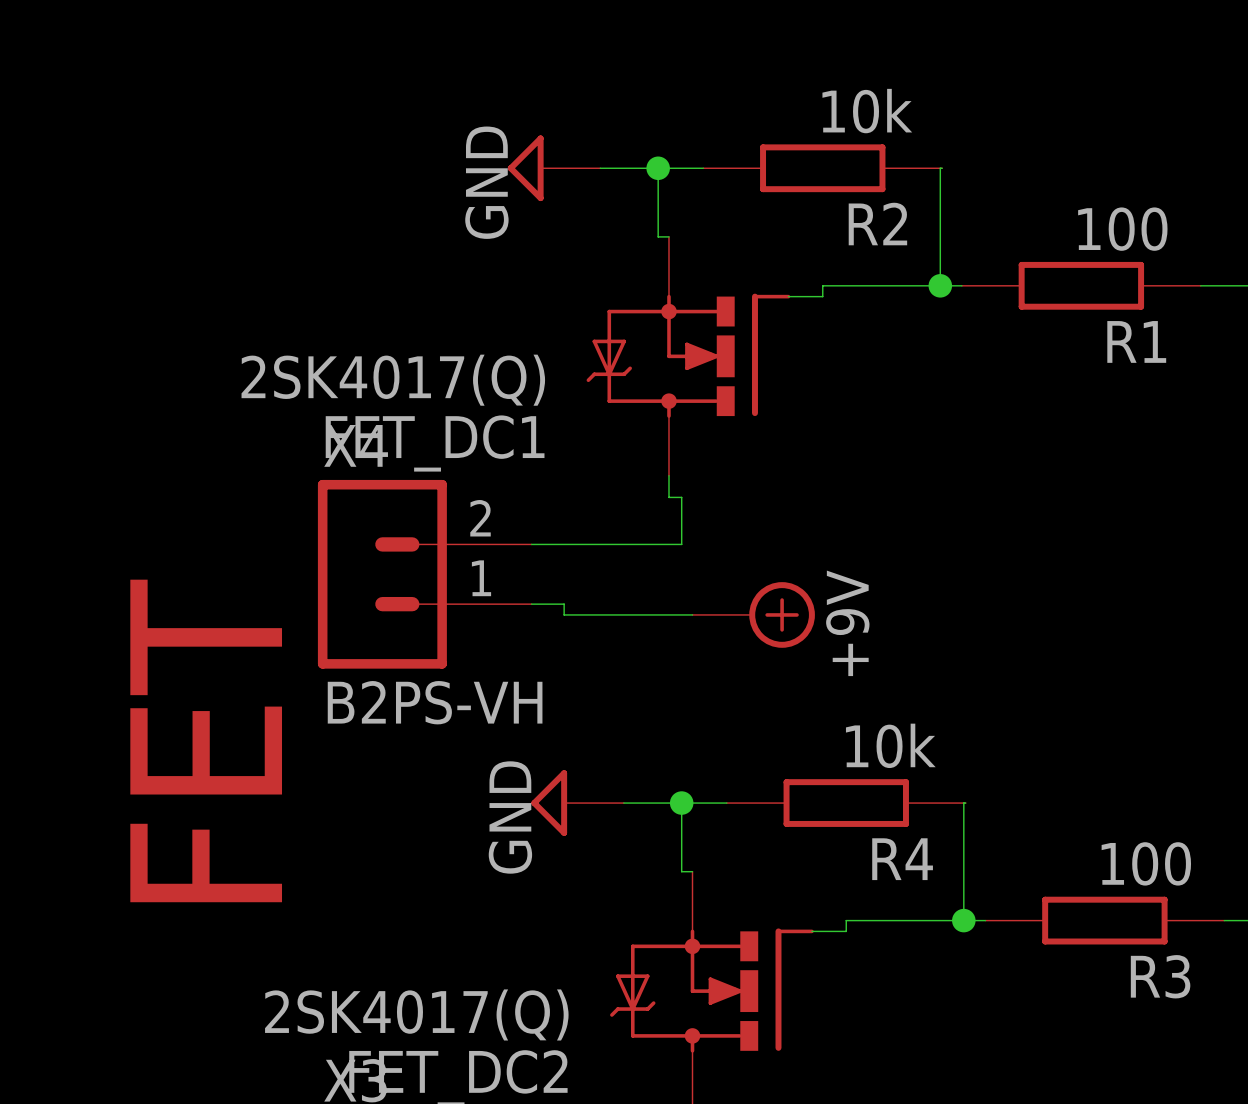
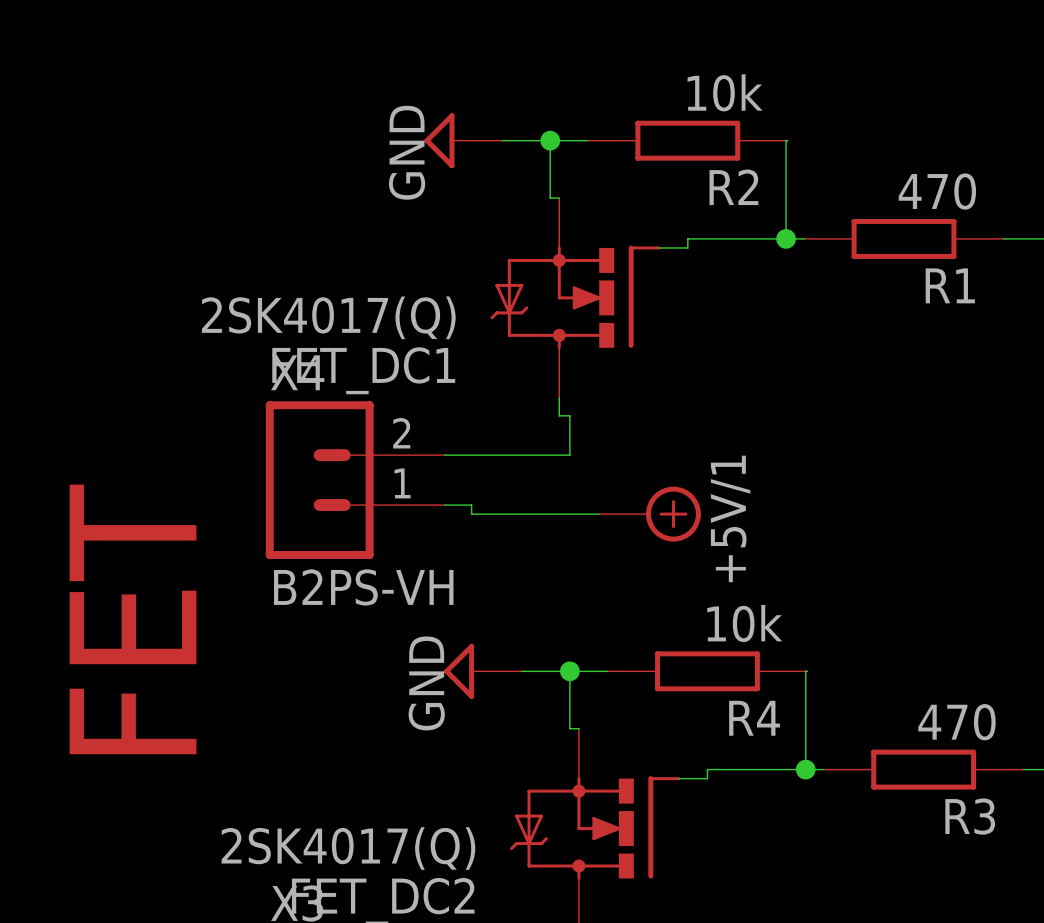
R1 value: 100 (1122, 229) -> 470 (937, 191)
power symbol: +9V (753, 614) -> none
power symbol: none -> +5V/1 (649, 514)
text position: FET (206, 740) -> FET (133, 619)
R3 value: 100 (1146, 863) -> 470 (957, 722)

